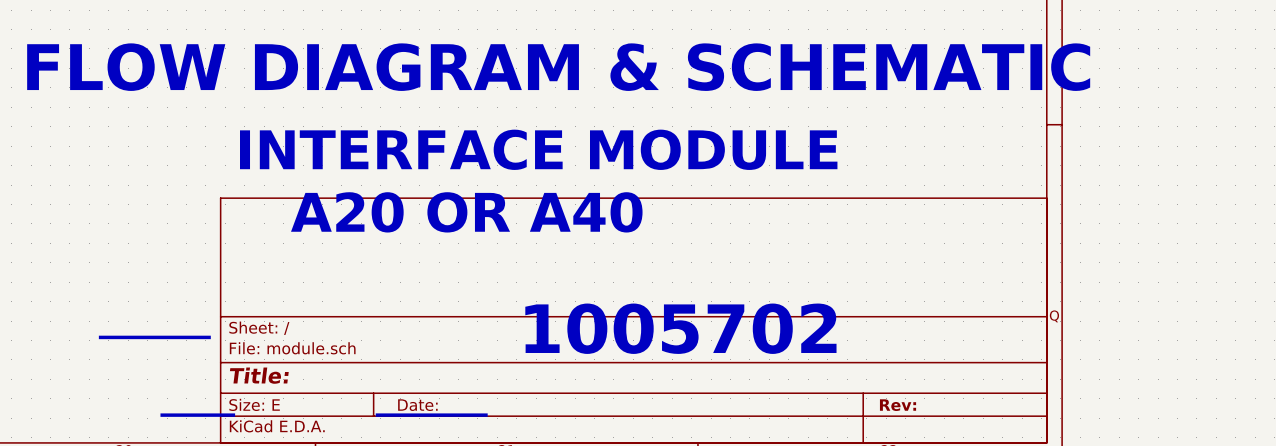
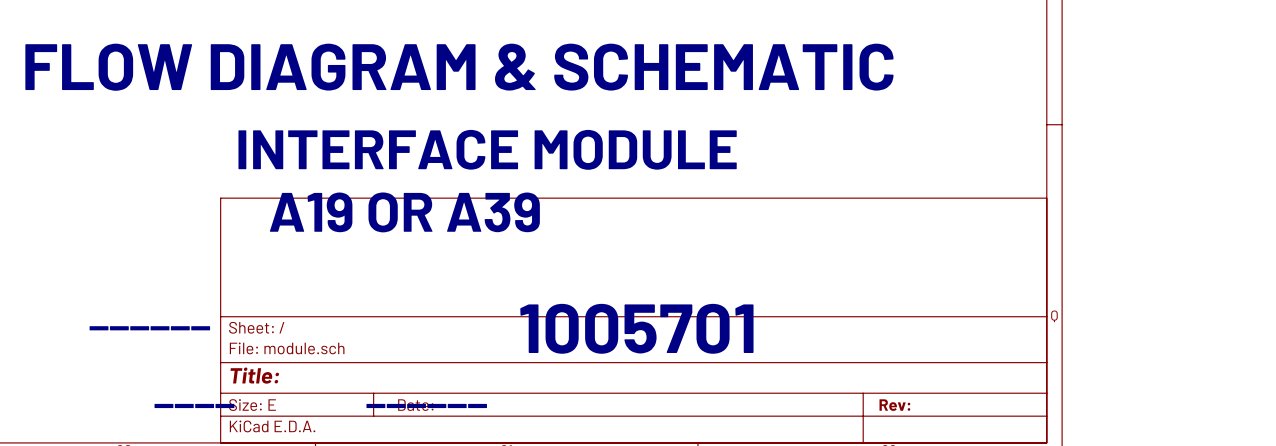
text: A20 OR A40 (466, 212) -> A19 OR A39 (404, 212)
text: 1005702 (680, 328) -> 1005701 (636, 328)

